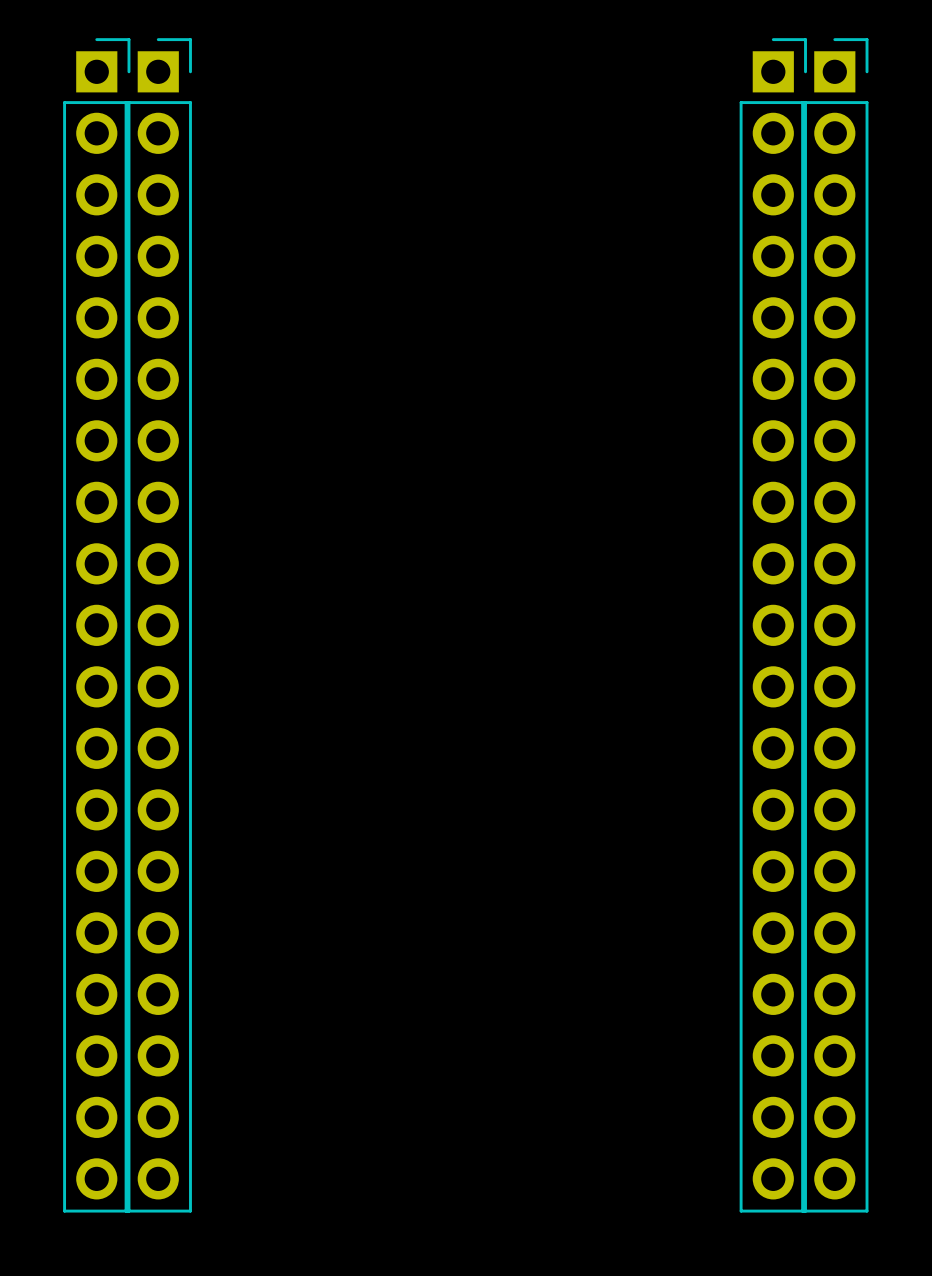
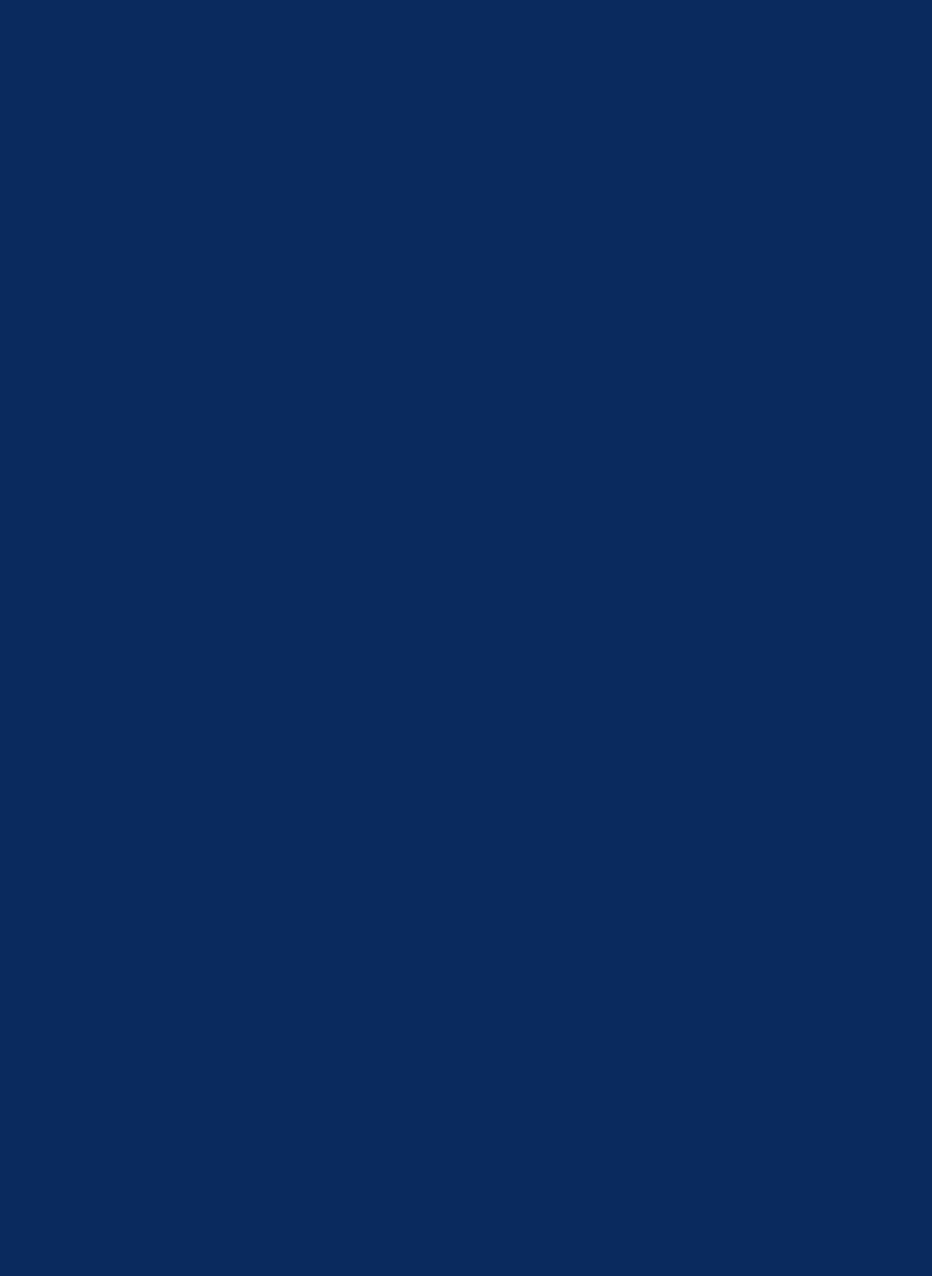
part: (96, 625) -> none
part: (158, 625) -> none
part: (773, 625) -> none
part: (834, 625) -> none

